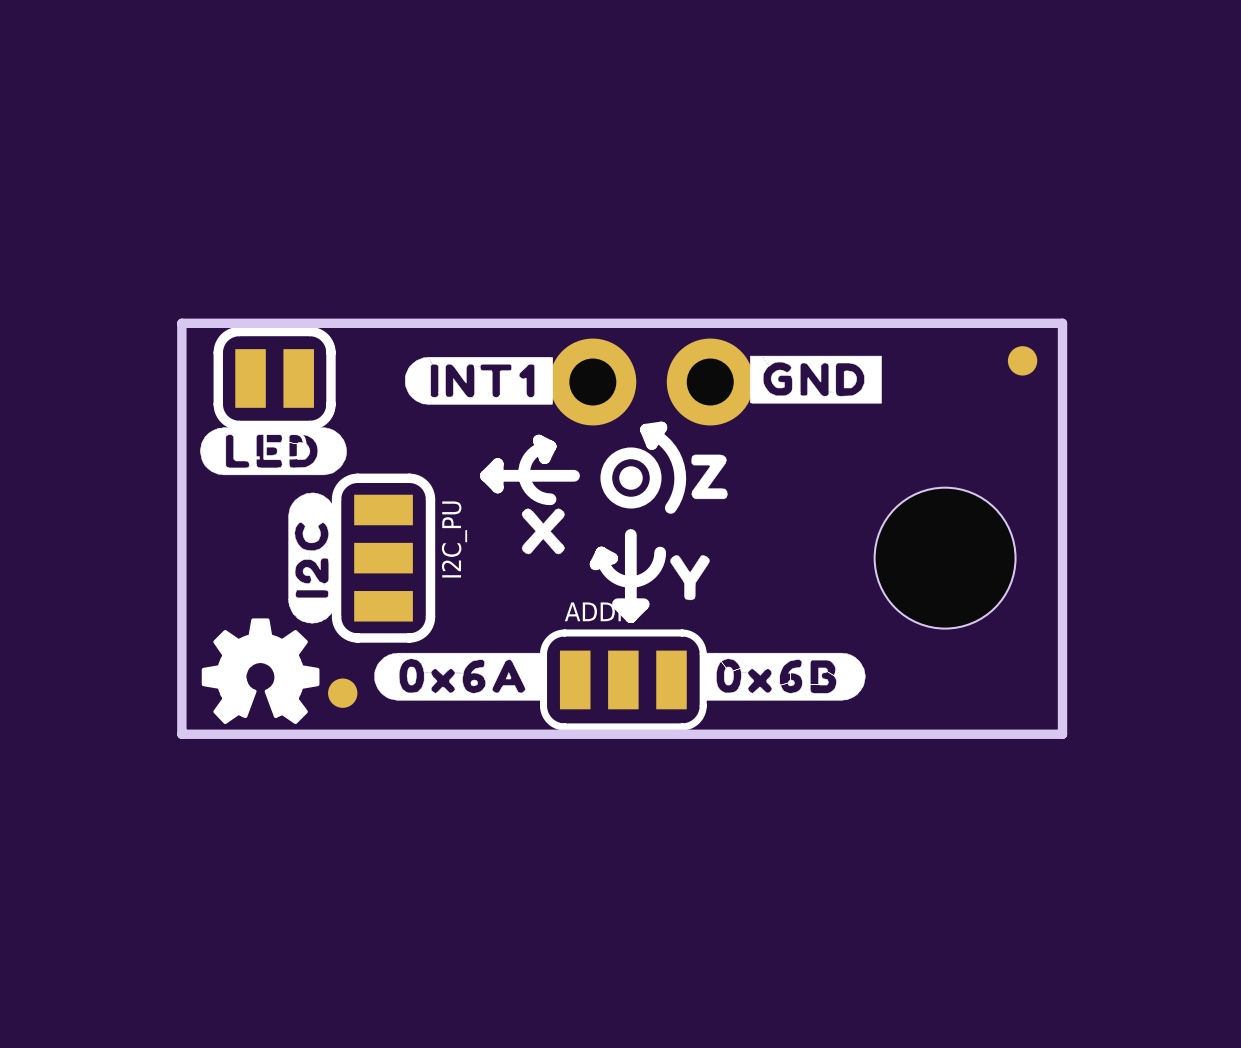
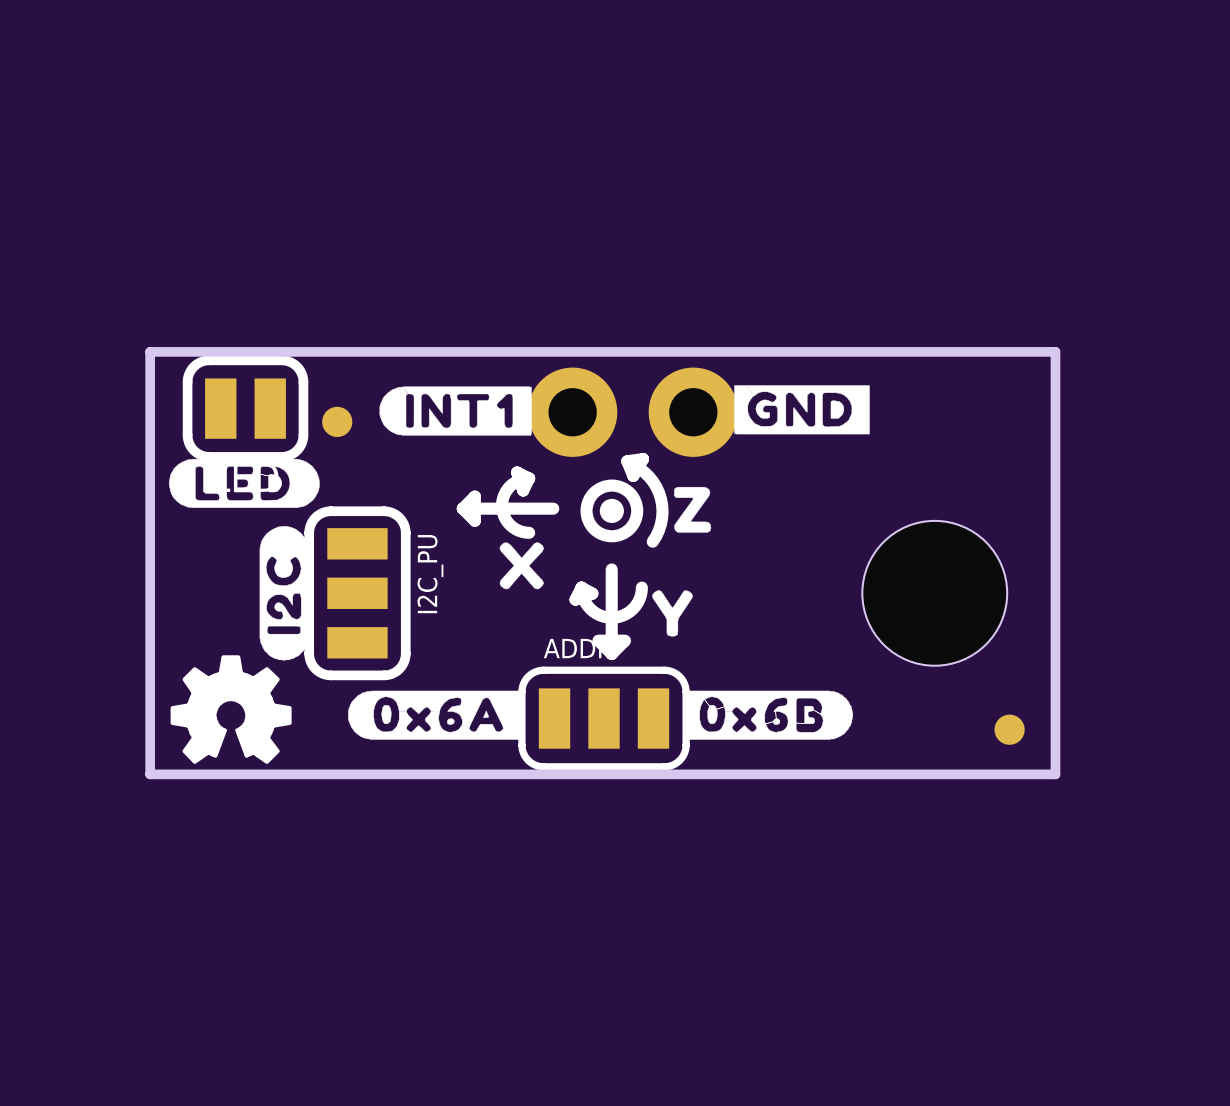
part: (1022, 360) -> none
part: none -> (1009, 729)
part position: (342, 693) -> (337, 421)

